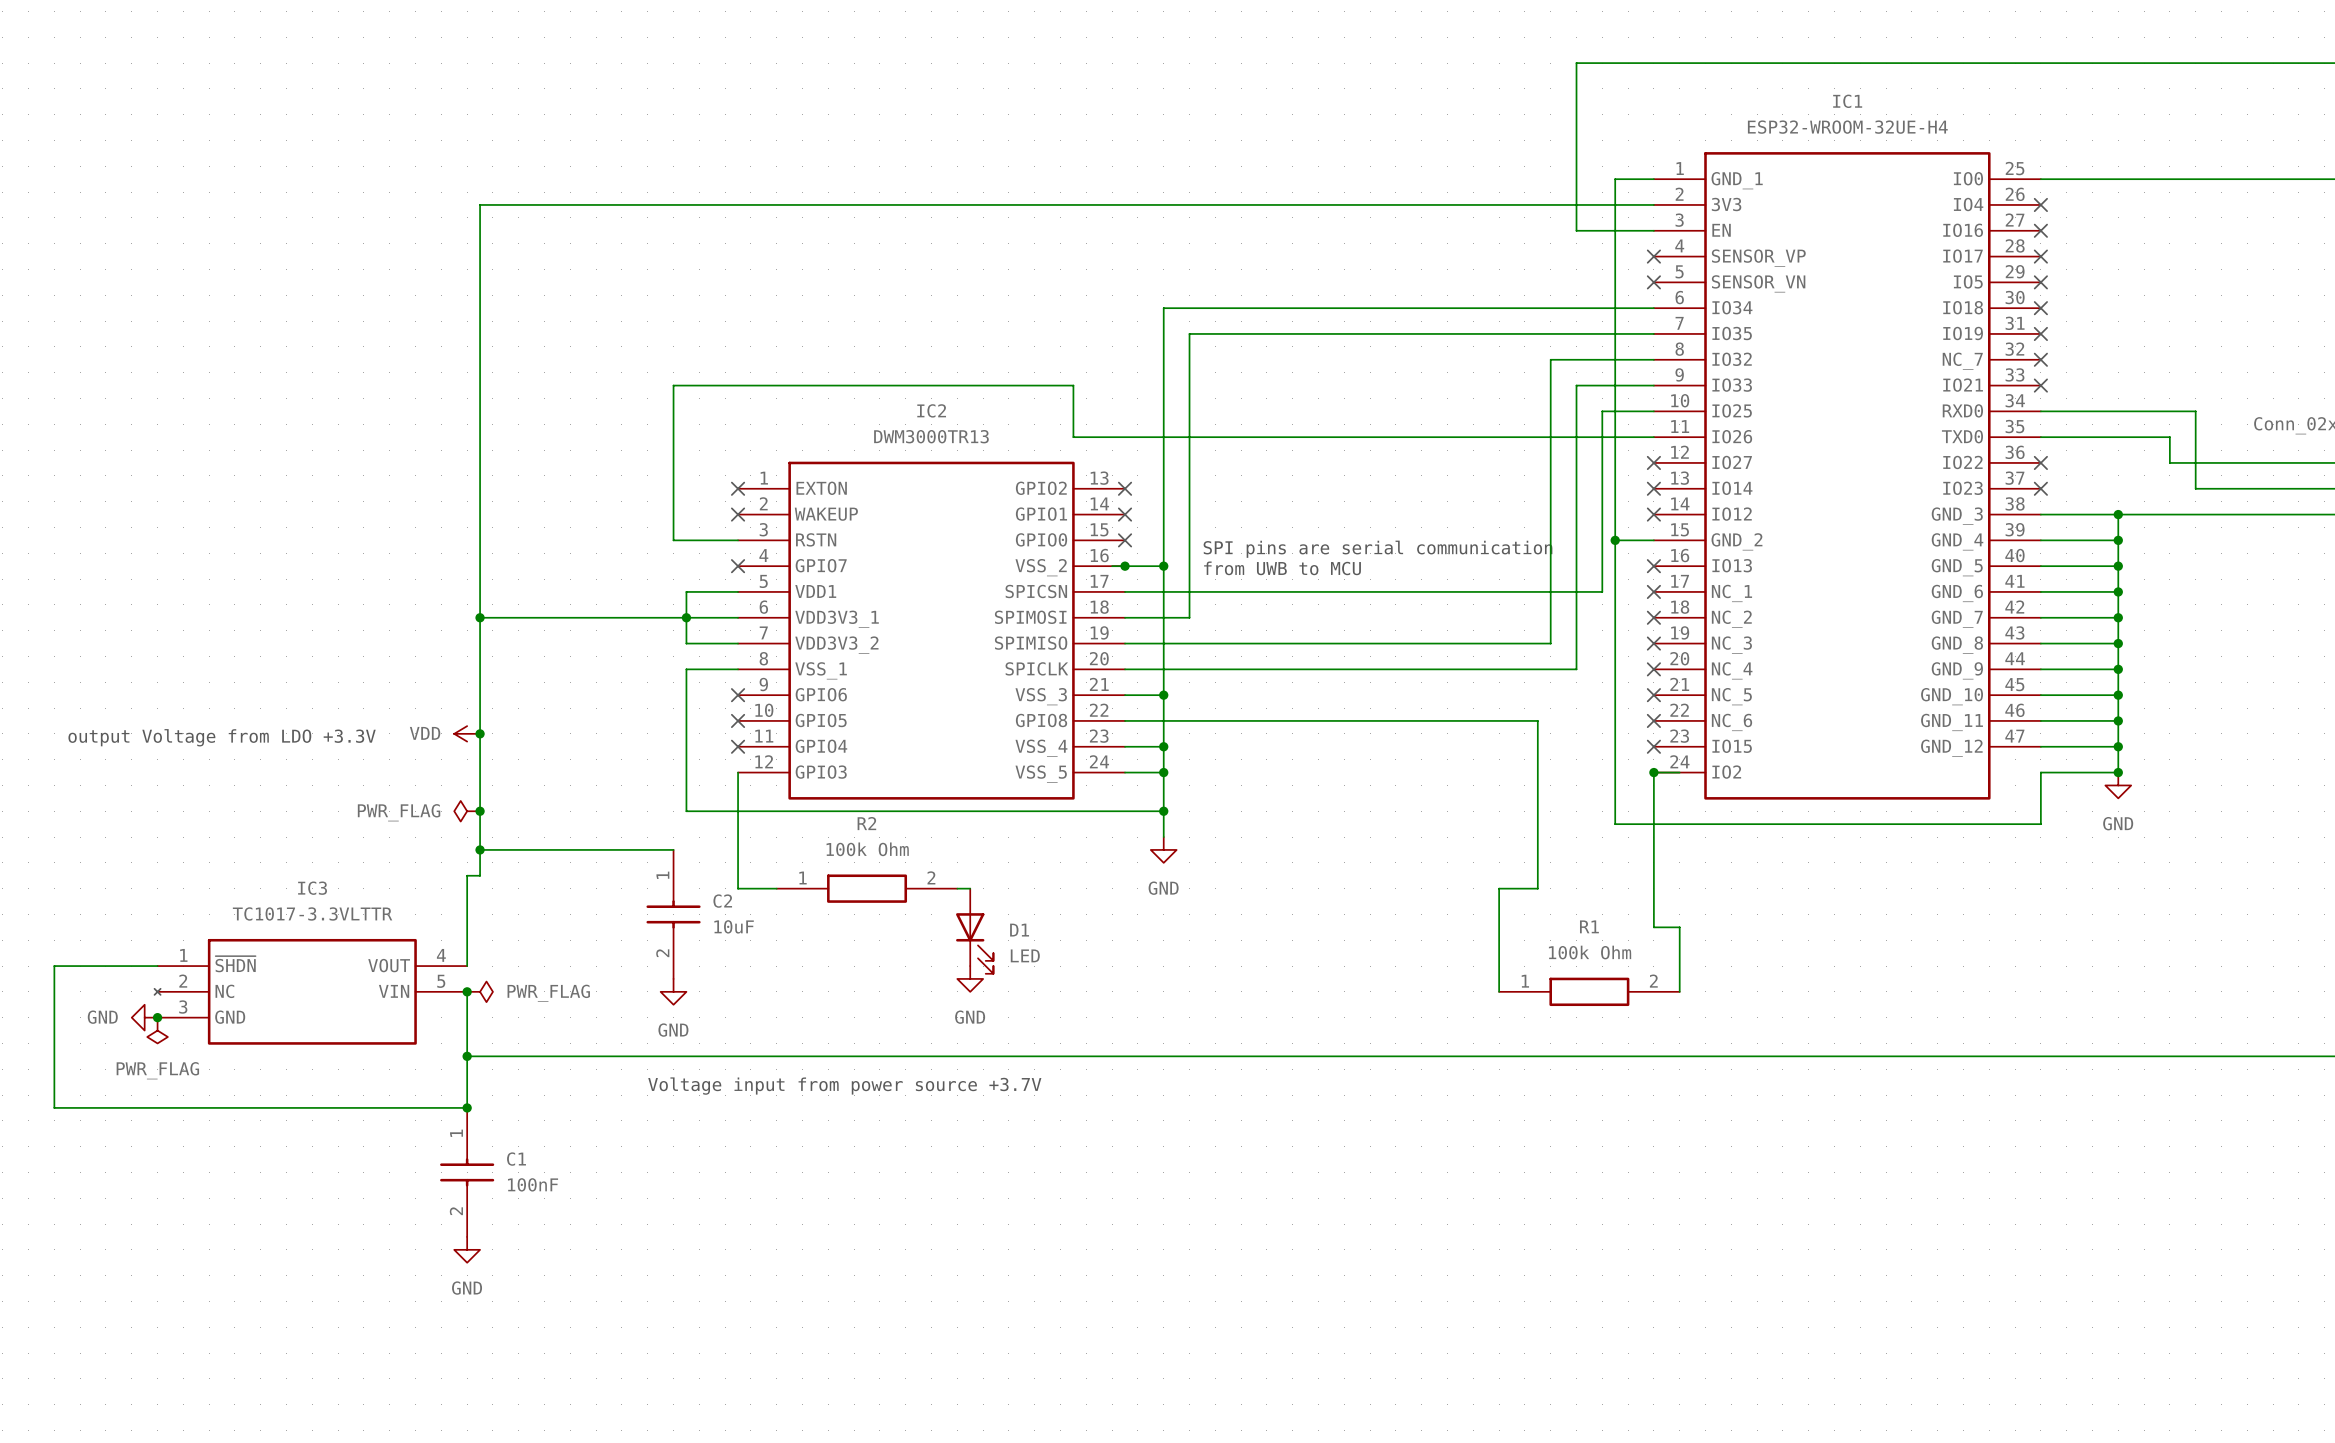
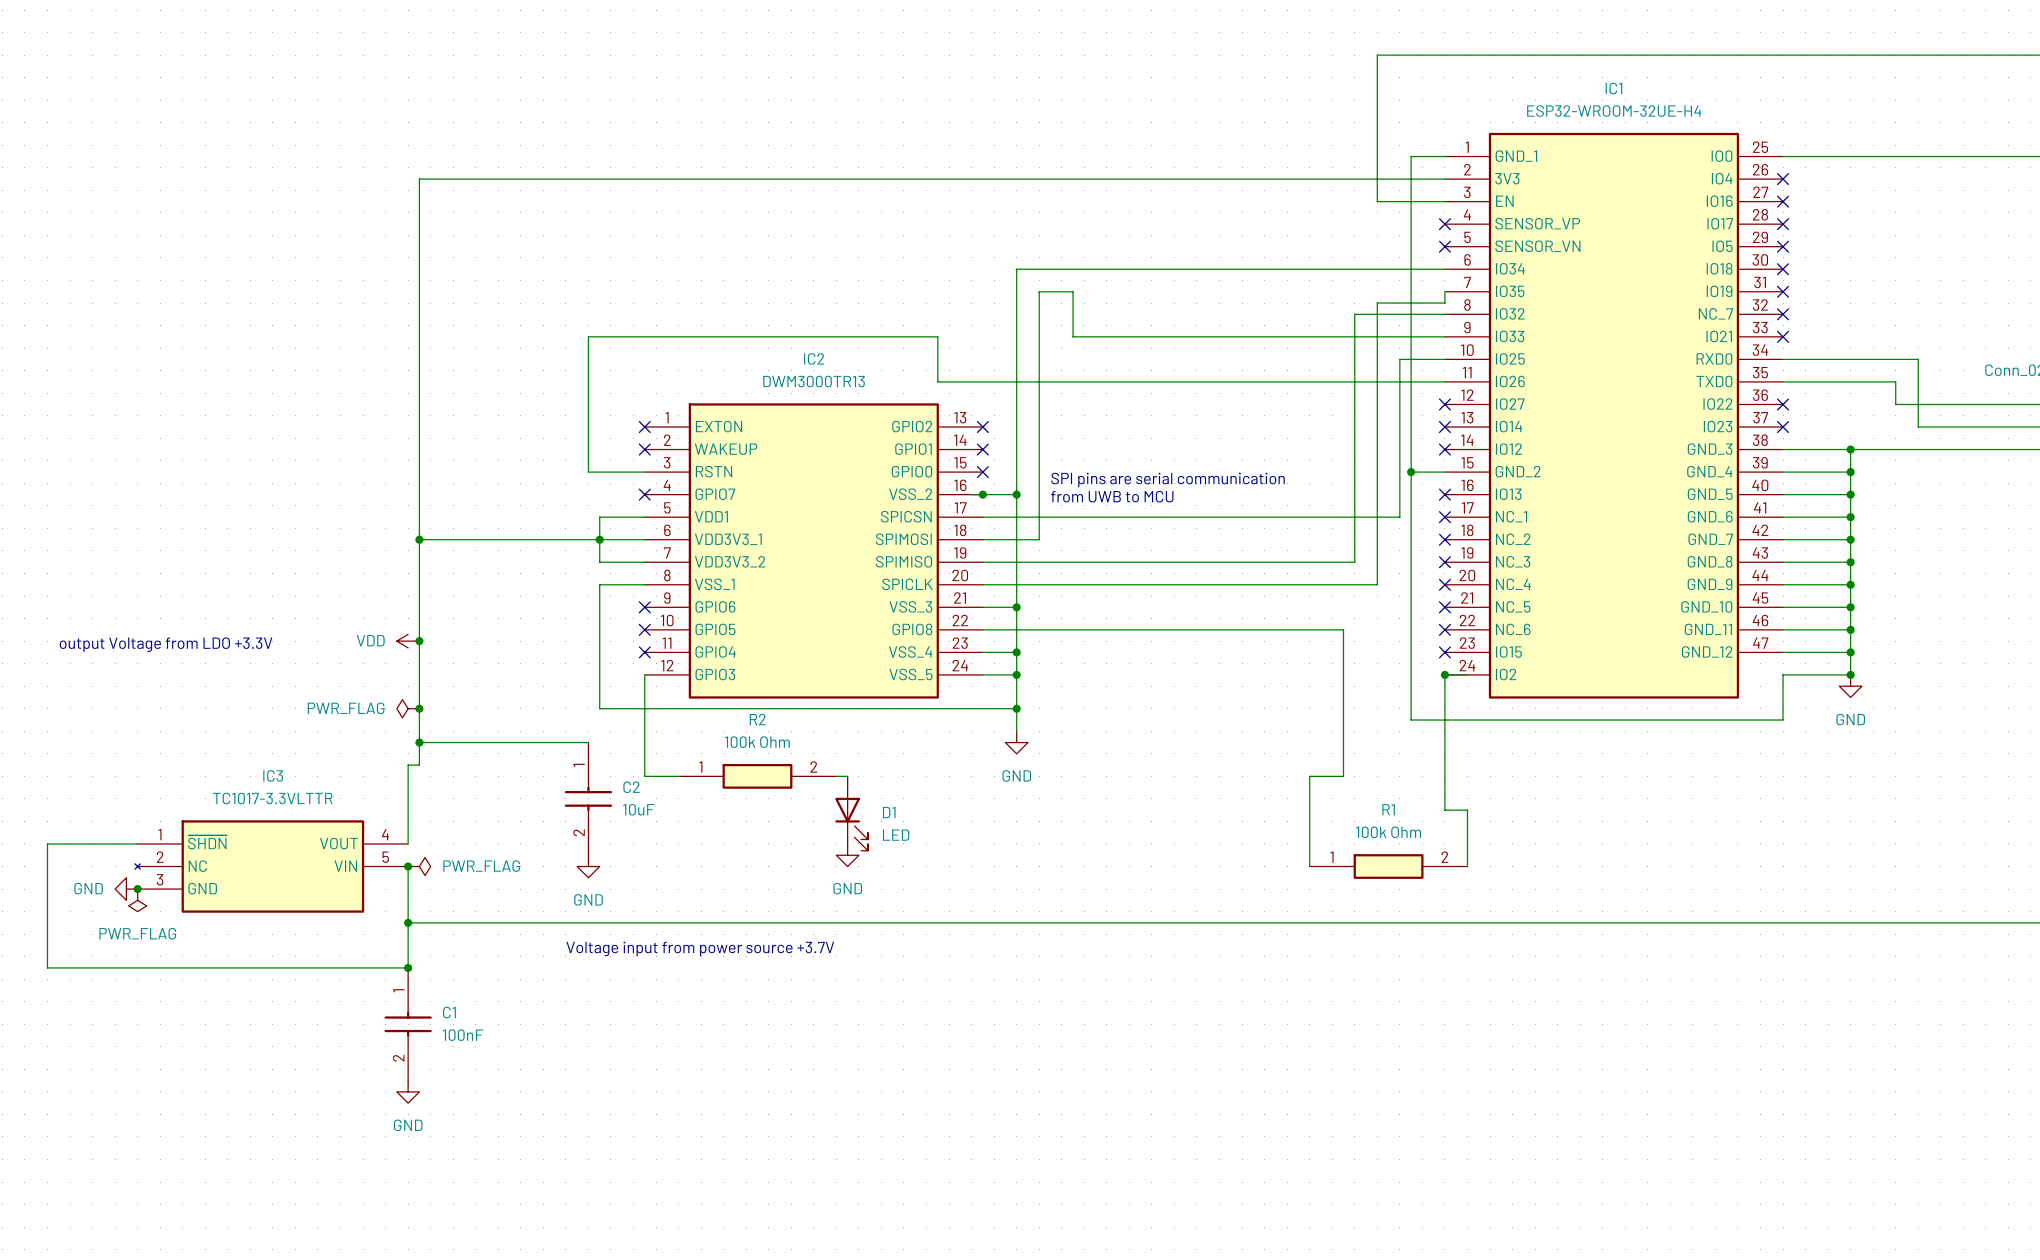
wire: (1228, 333) (1653, 333) -> (1073, 291) (1073, 336) (1377, 336) (1377, 303) (1444, 303) (1444, 291)

